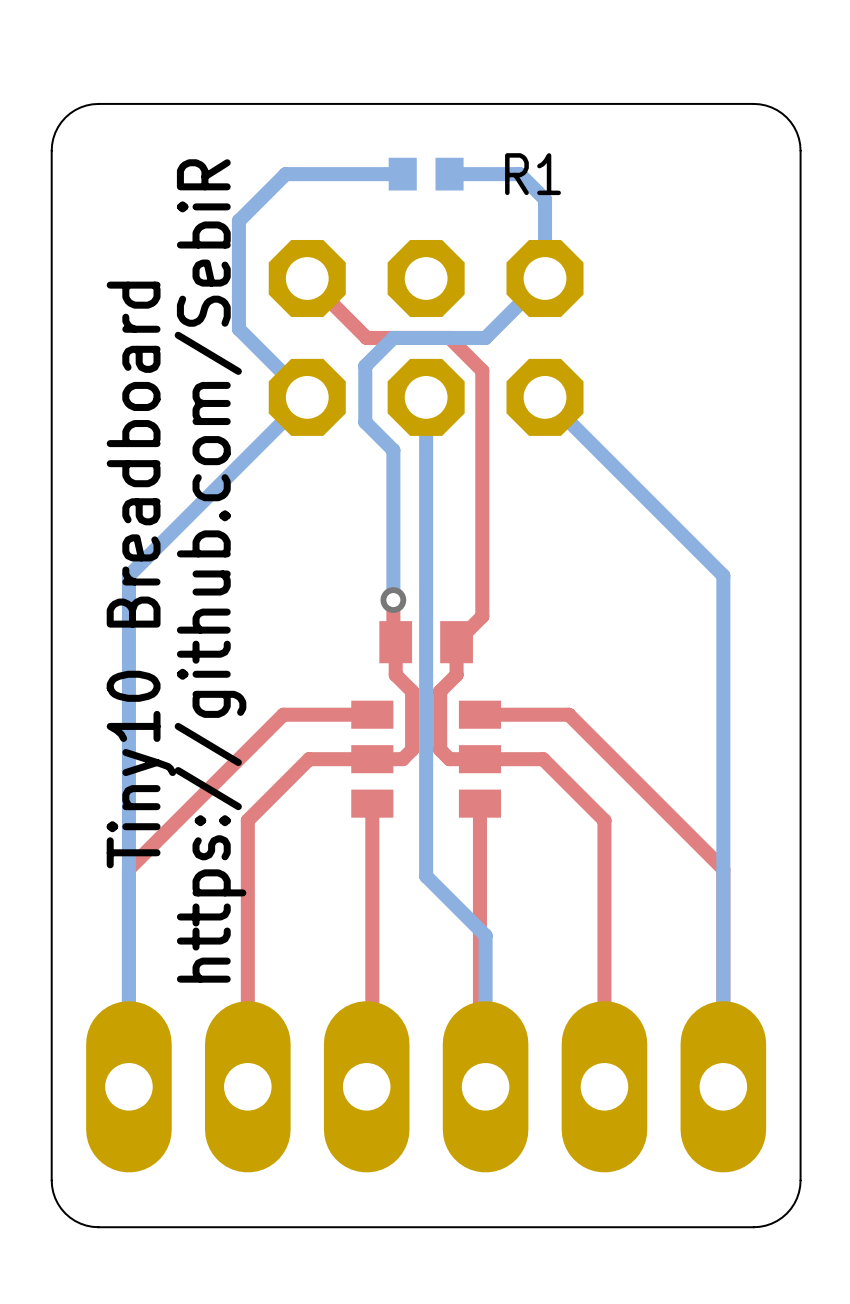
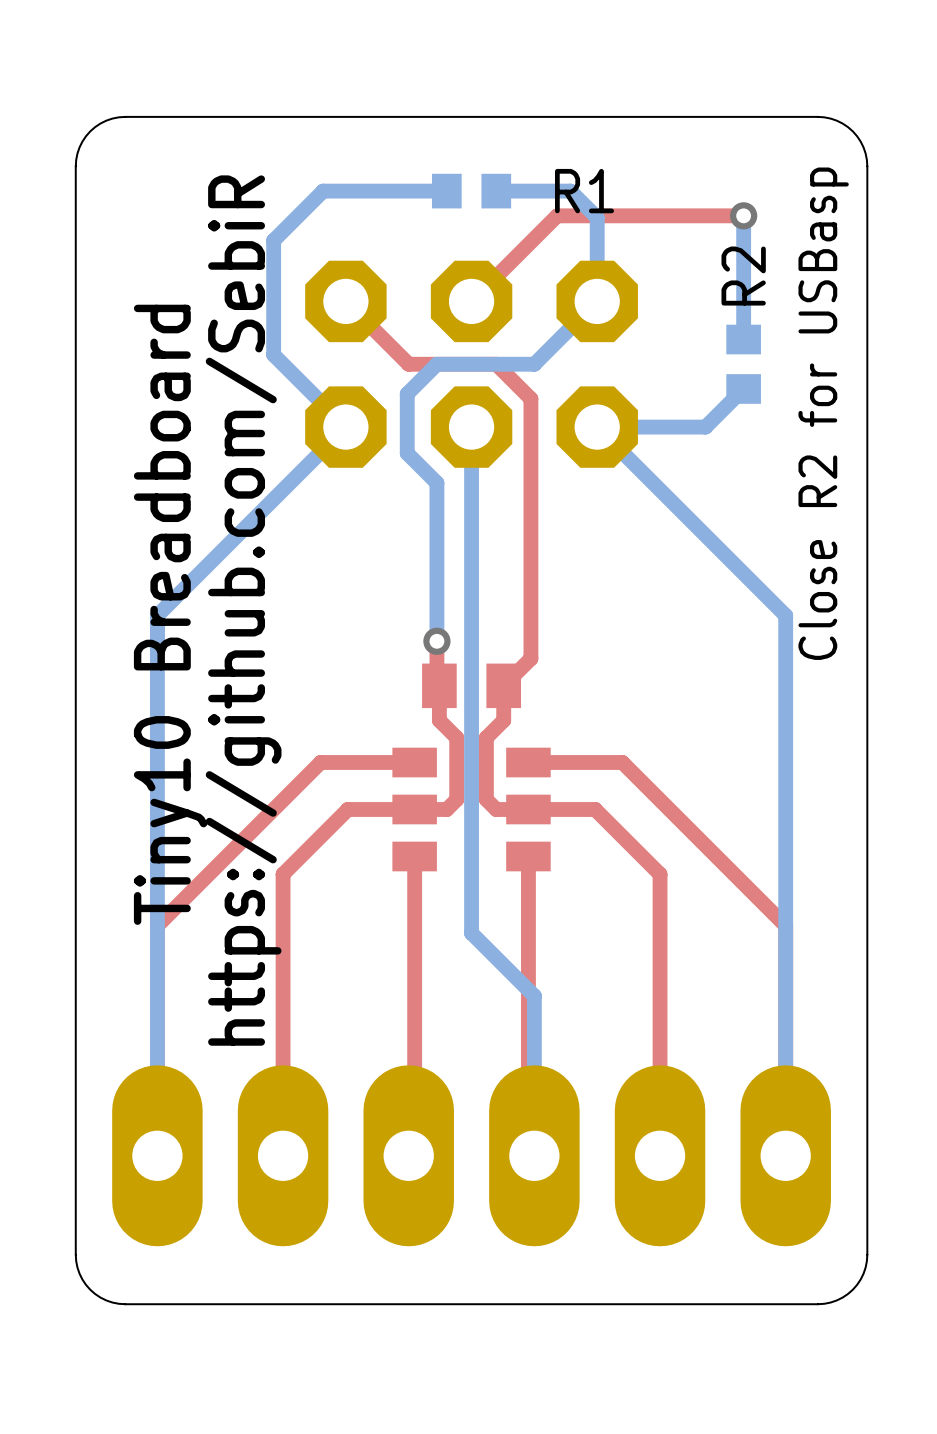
top track: none -> (743, 215) (557, 215) (471, 301)
bottom track: none -> (743, 215) (743, 339)
via: none -> (743, 215)
R2: none -> (743, 364)
bottom track: none -> (743, 388) (705, 427) (597, 427)
text: none -> Close R2 for USBasp (823, 413)

